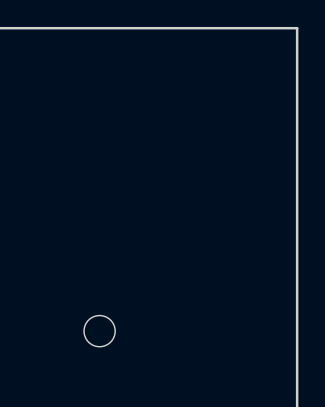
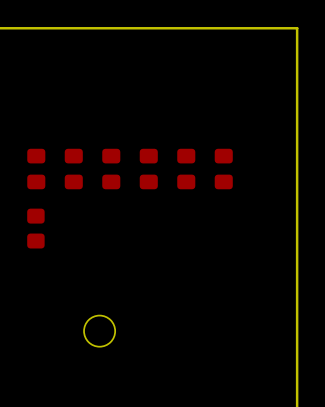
part: none -> (36, 169)
part: none -> (73, 169)
part: none -> (111, 169)
part: none -> (148, 169)
part: none -> (186, 169)
part: none -> (223, 169)
part: none -> (35, 228)

